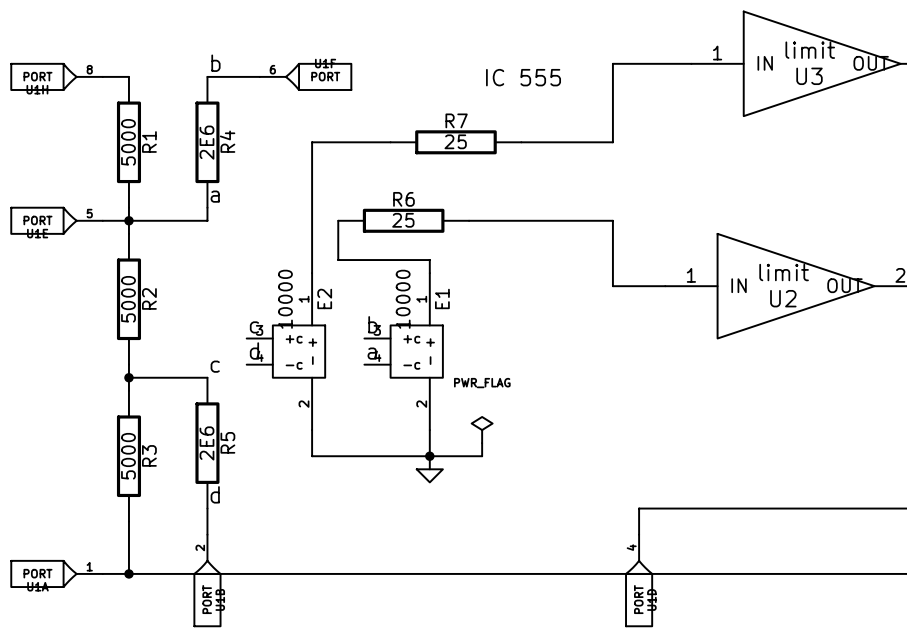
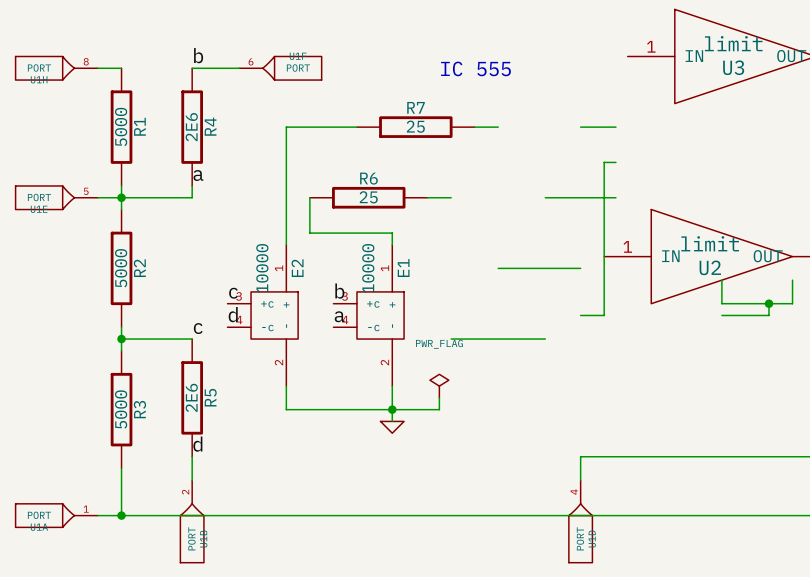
wire: (691, 63) (612, 63) (612, 142) (547, 142) -> none
wire: none -> (580, 127) (615, 127)
wire: none -> (615, 162) (604, 162) (604, 315) (580, 315)
wire: (495, 220) (599, 220) -> (451, 339) (545, 339)
wire: (612, 220) (612, 286) (665, 286) -> (557, 197) (615, 197)
wire: none -> (498, 268) (580, 268)
wire: none -> (721, 280) (721, 303) (792, 303) (792, 280)
wire: none -> (768, 303) (768, 315) (721, 315)
junction: none -> (768, 303)

